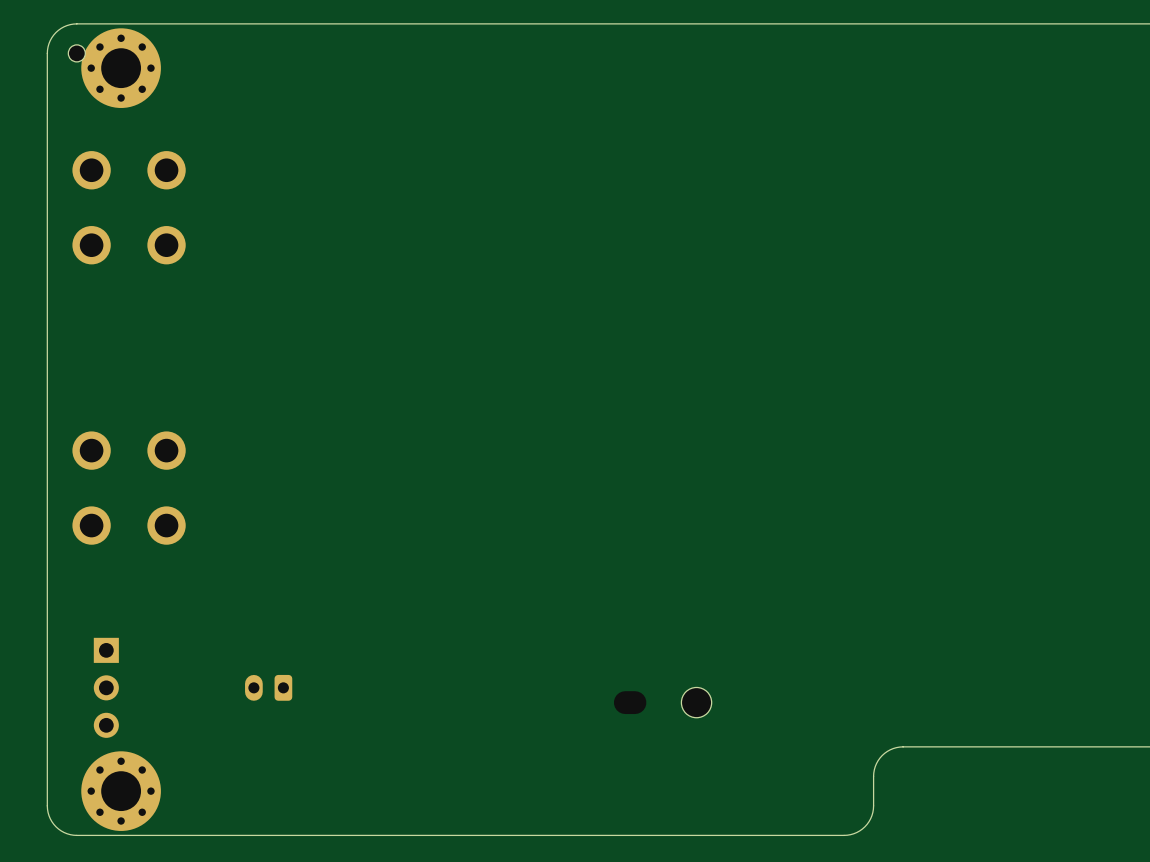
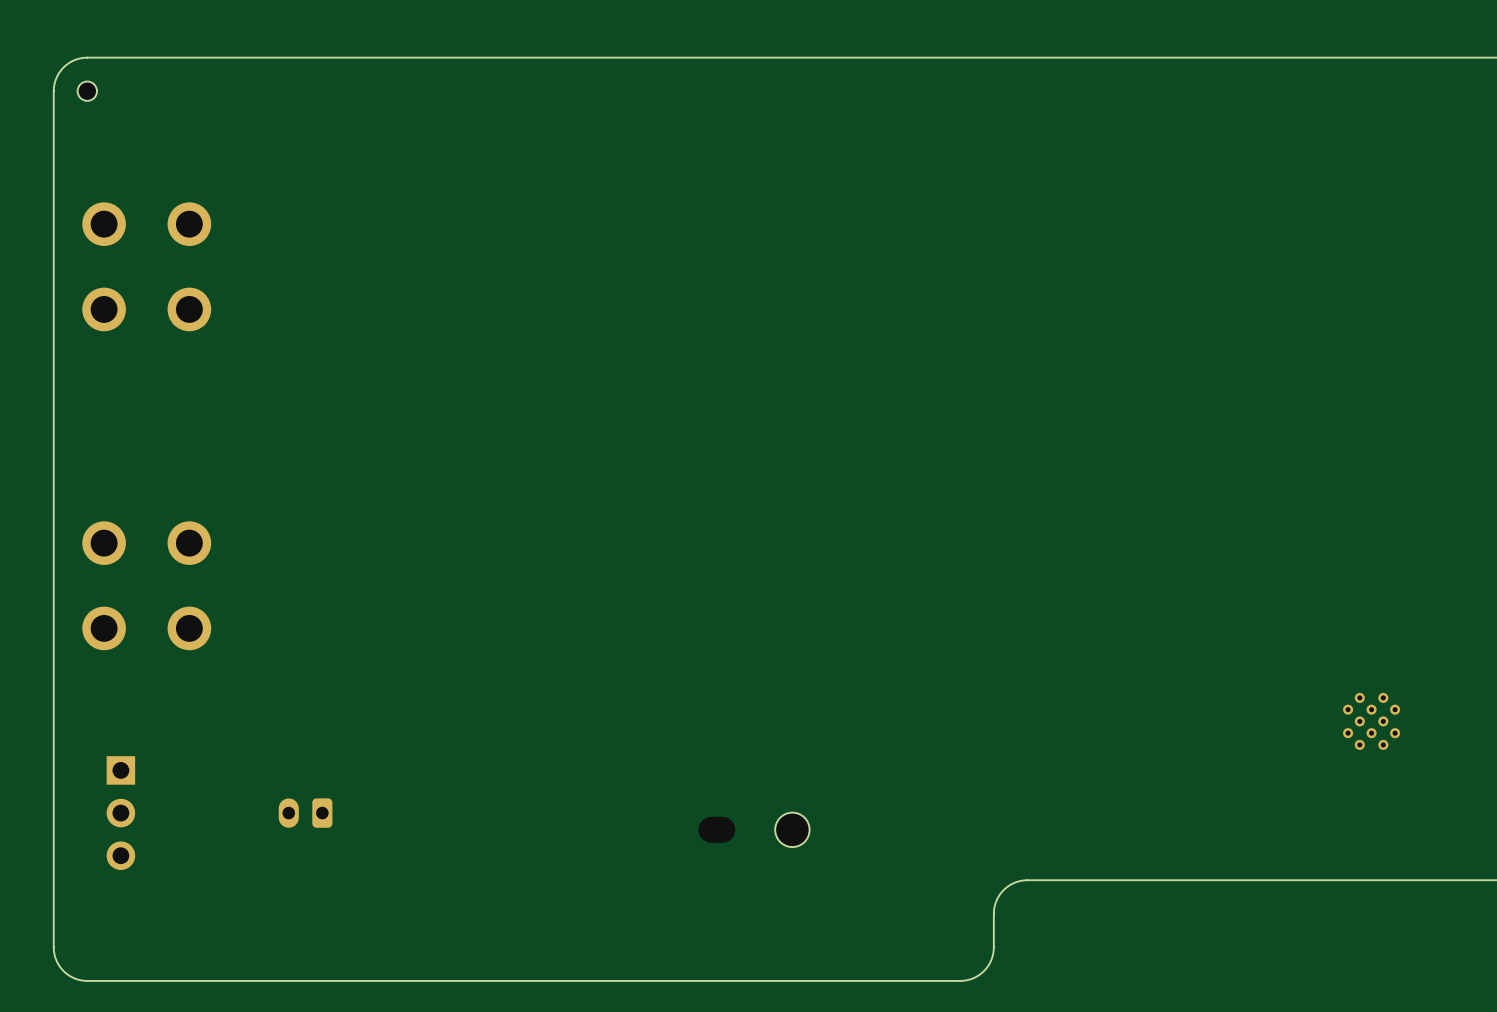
part: (121, 68) -> none
part: (121, 791) -> none

